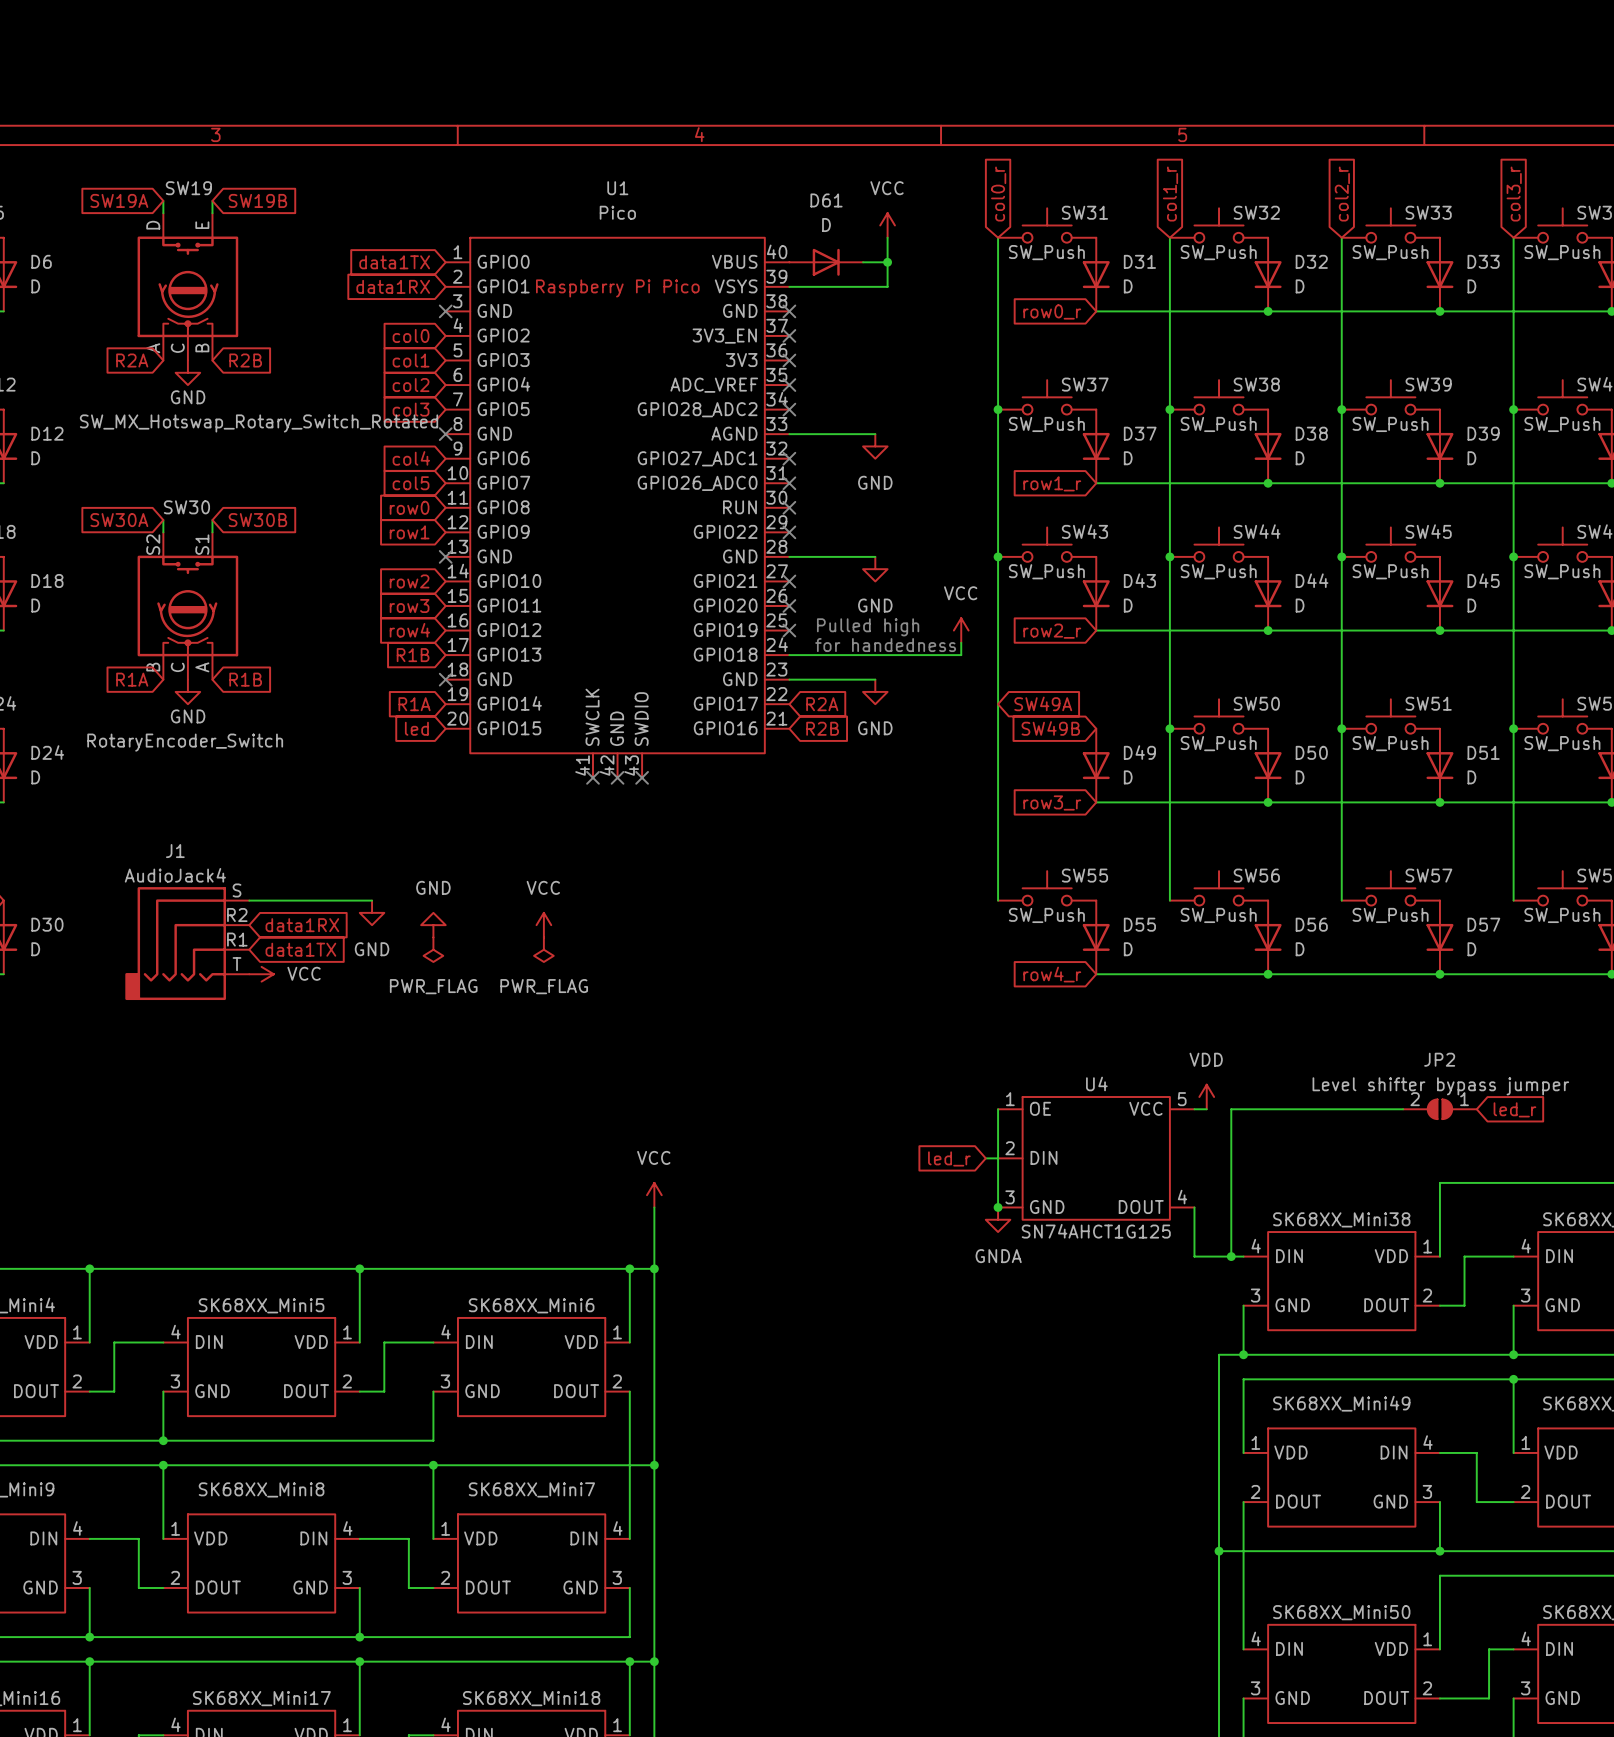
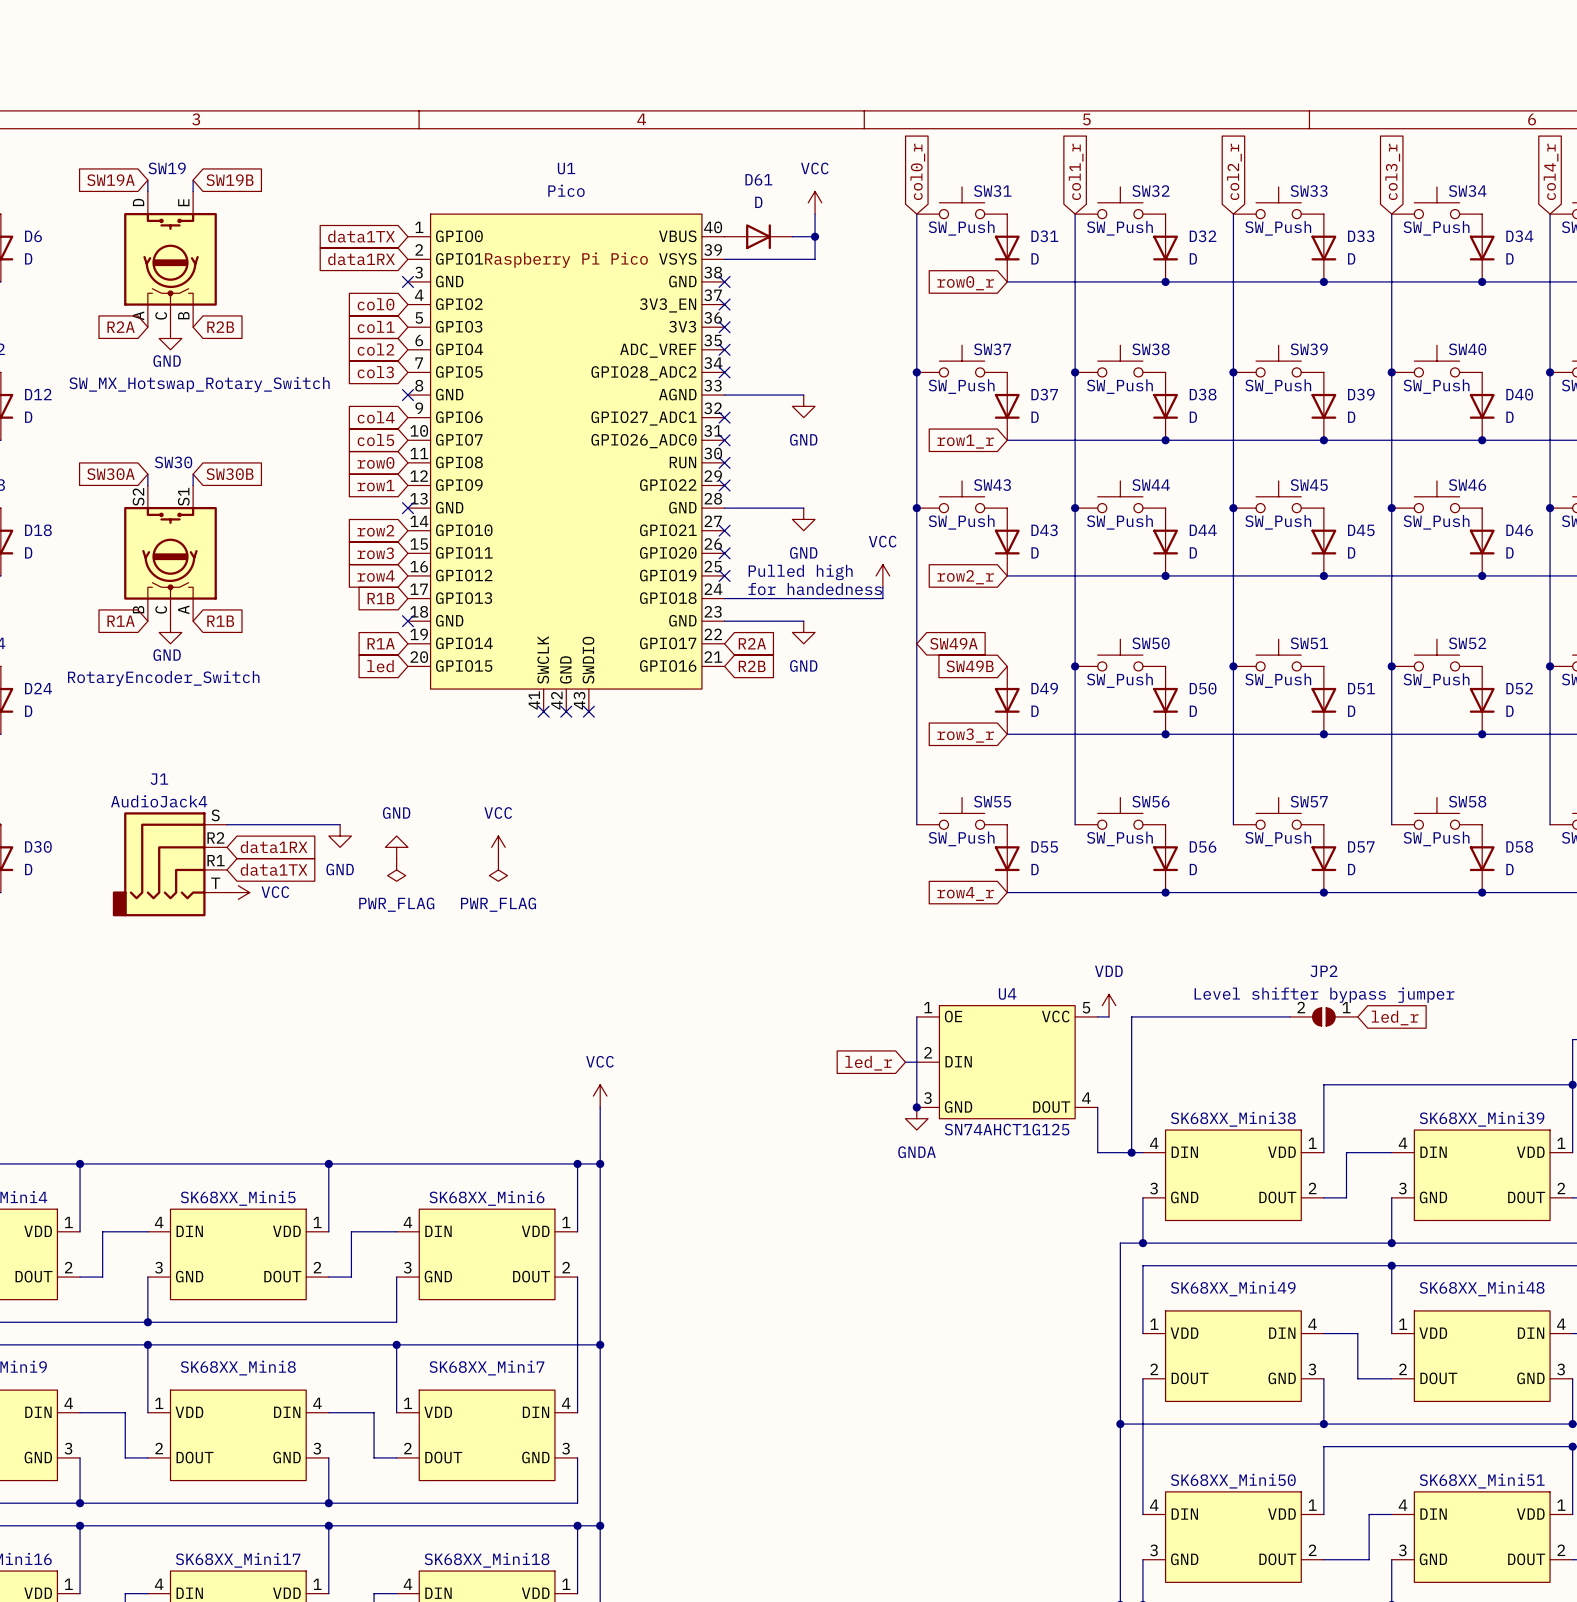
SW19 value: SW_MX_Hotswap_Rotary_Switch_Rotated (259, 423) -> SW_MX_Hotswap_Rotary_Switch (199, 384)

